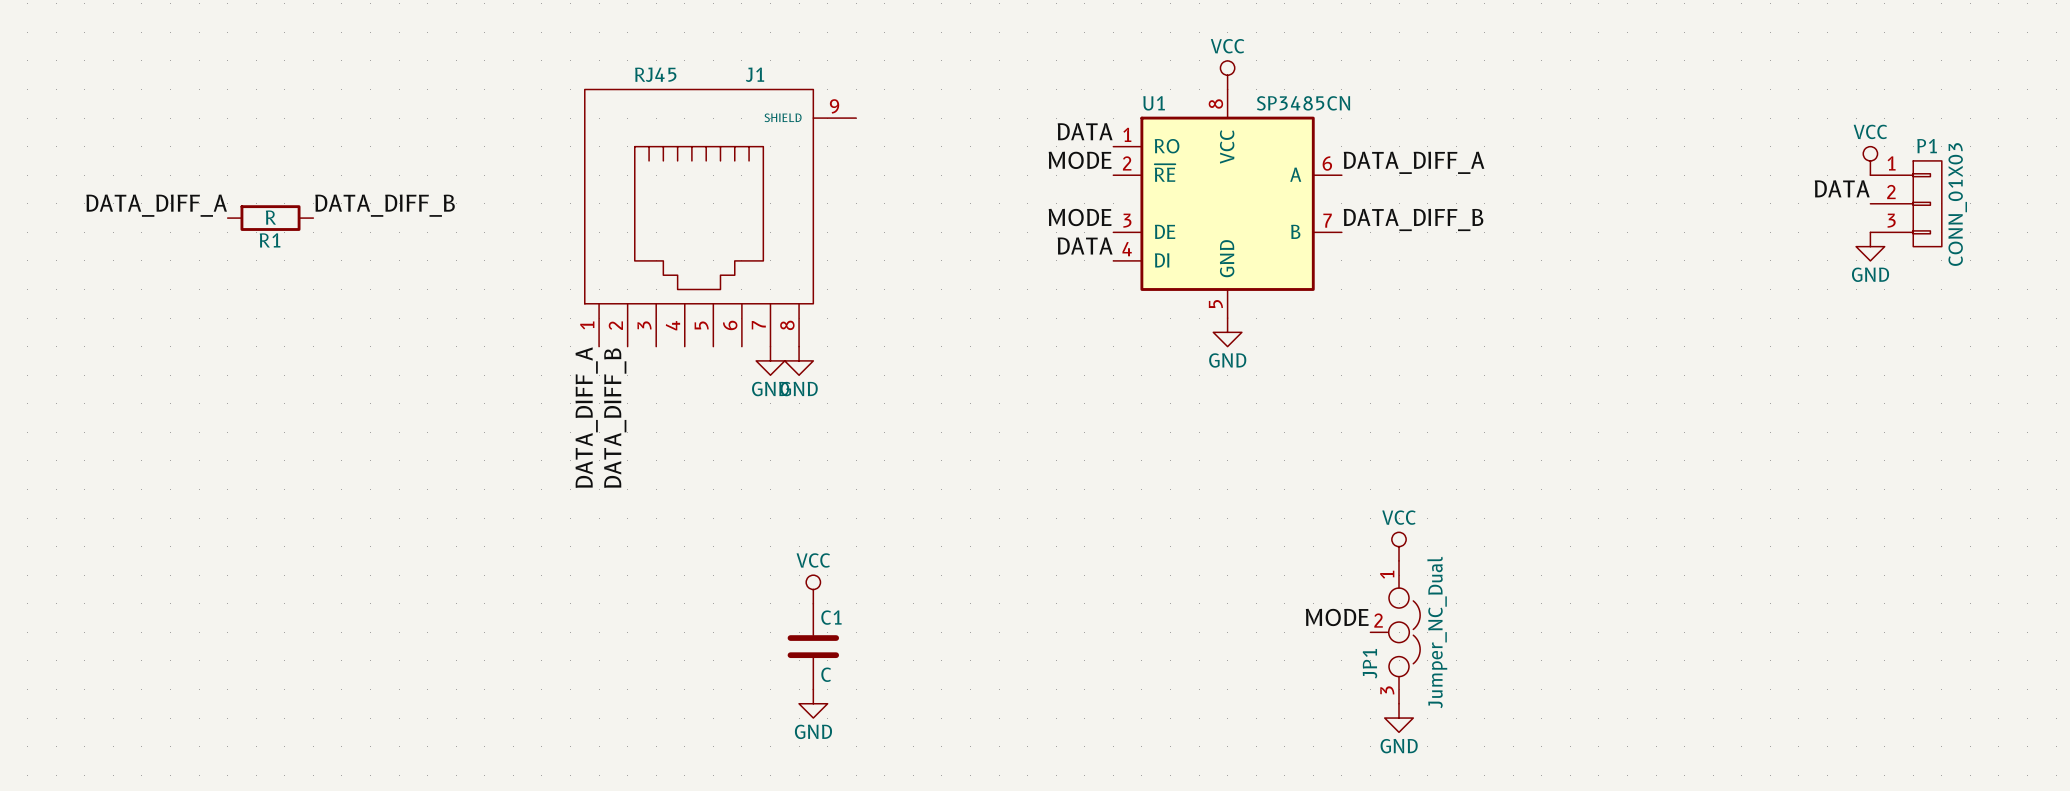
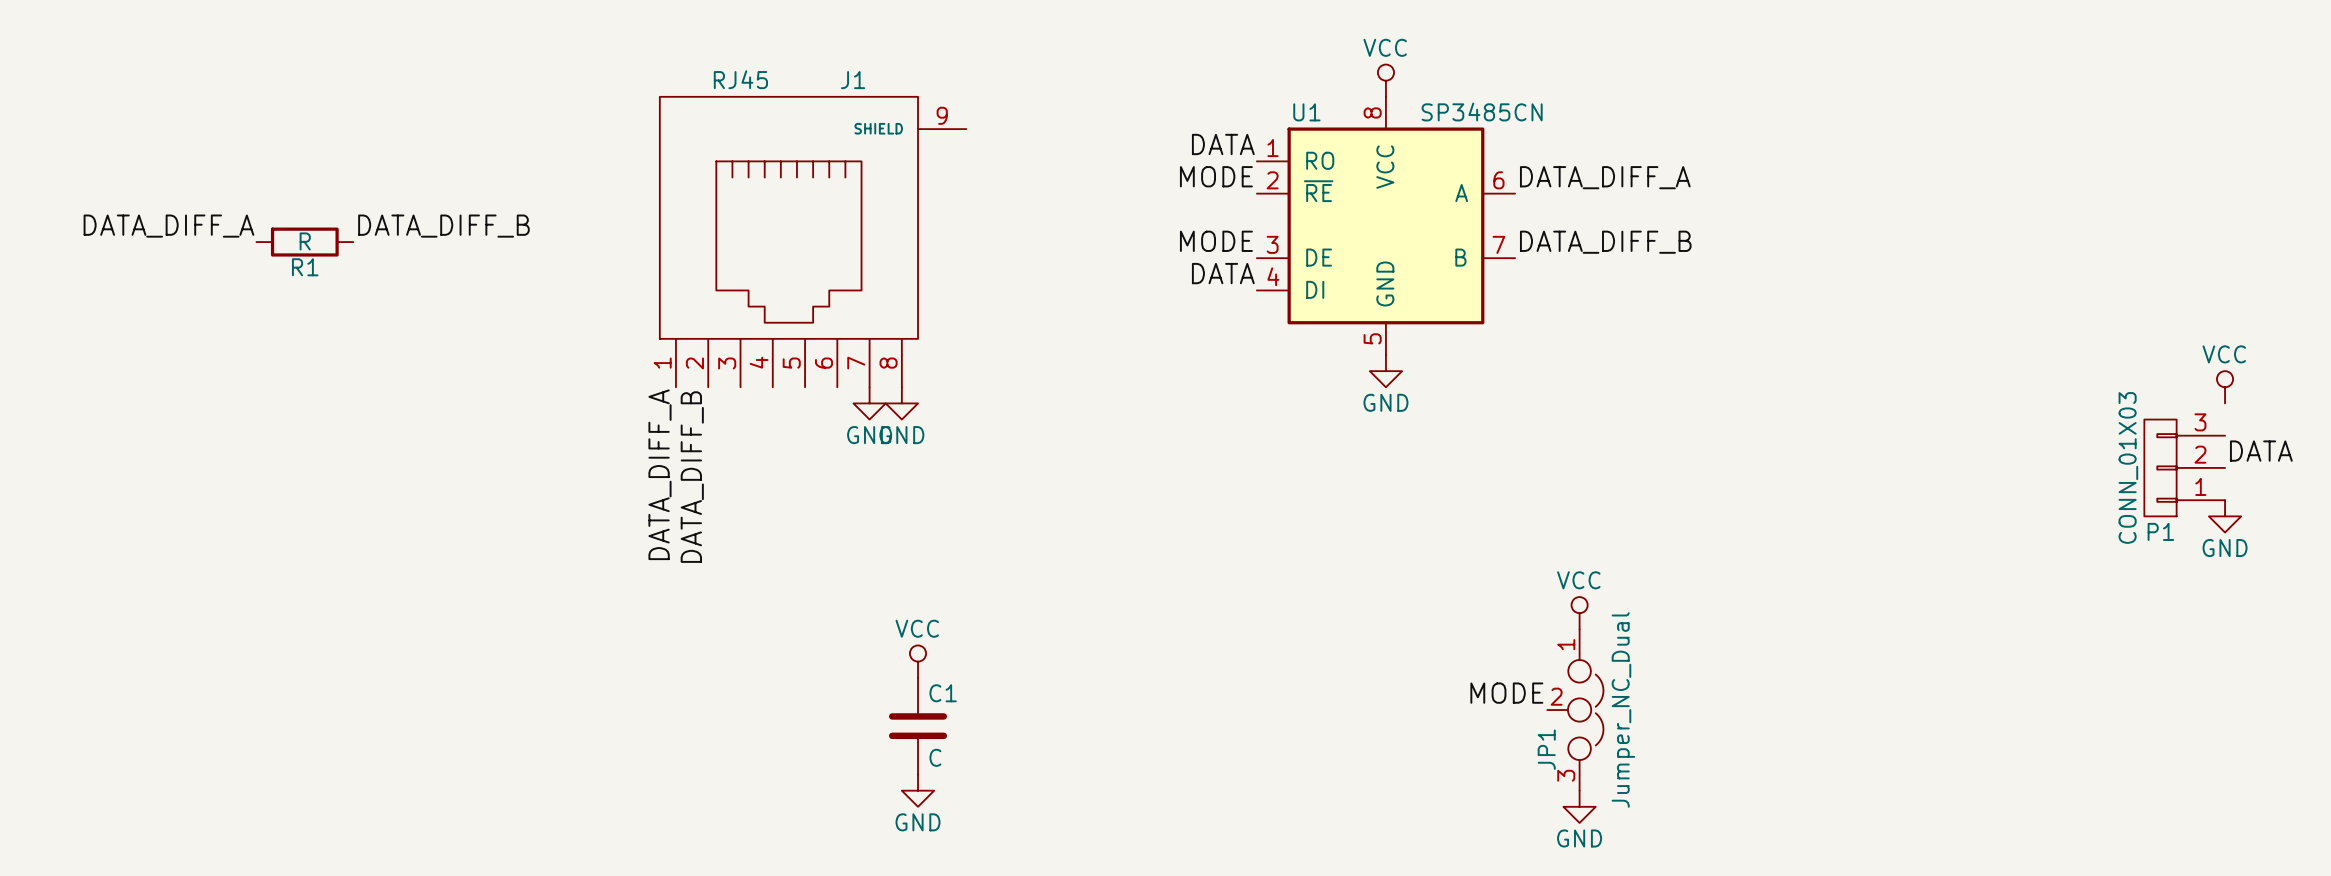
power symbol position: VCC (1870, 160) -> VCC (2225, 387)
label position: DATA (1842, 188) -> DATA (2261, 451)
P1 position: (1906, 203) -> (2184, 467)
P1 rotation: 0° (1927, 203) -> 180° (2160, 467)
power symbol position: GND (1870, 246) -> GND (2225, 516)

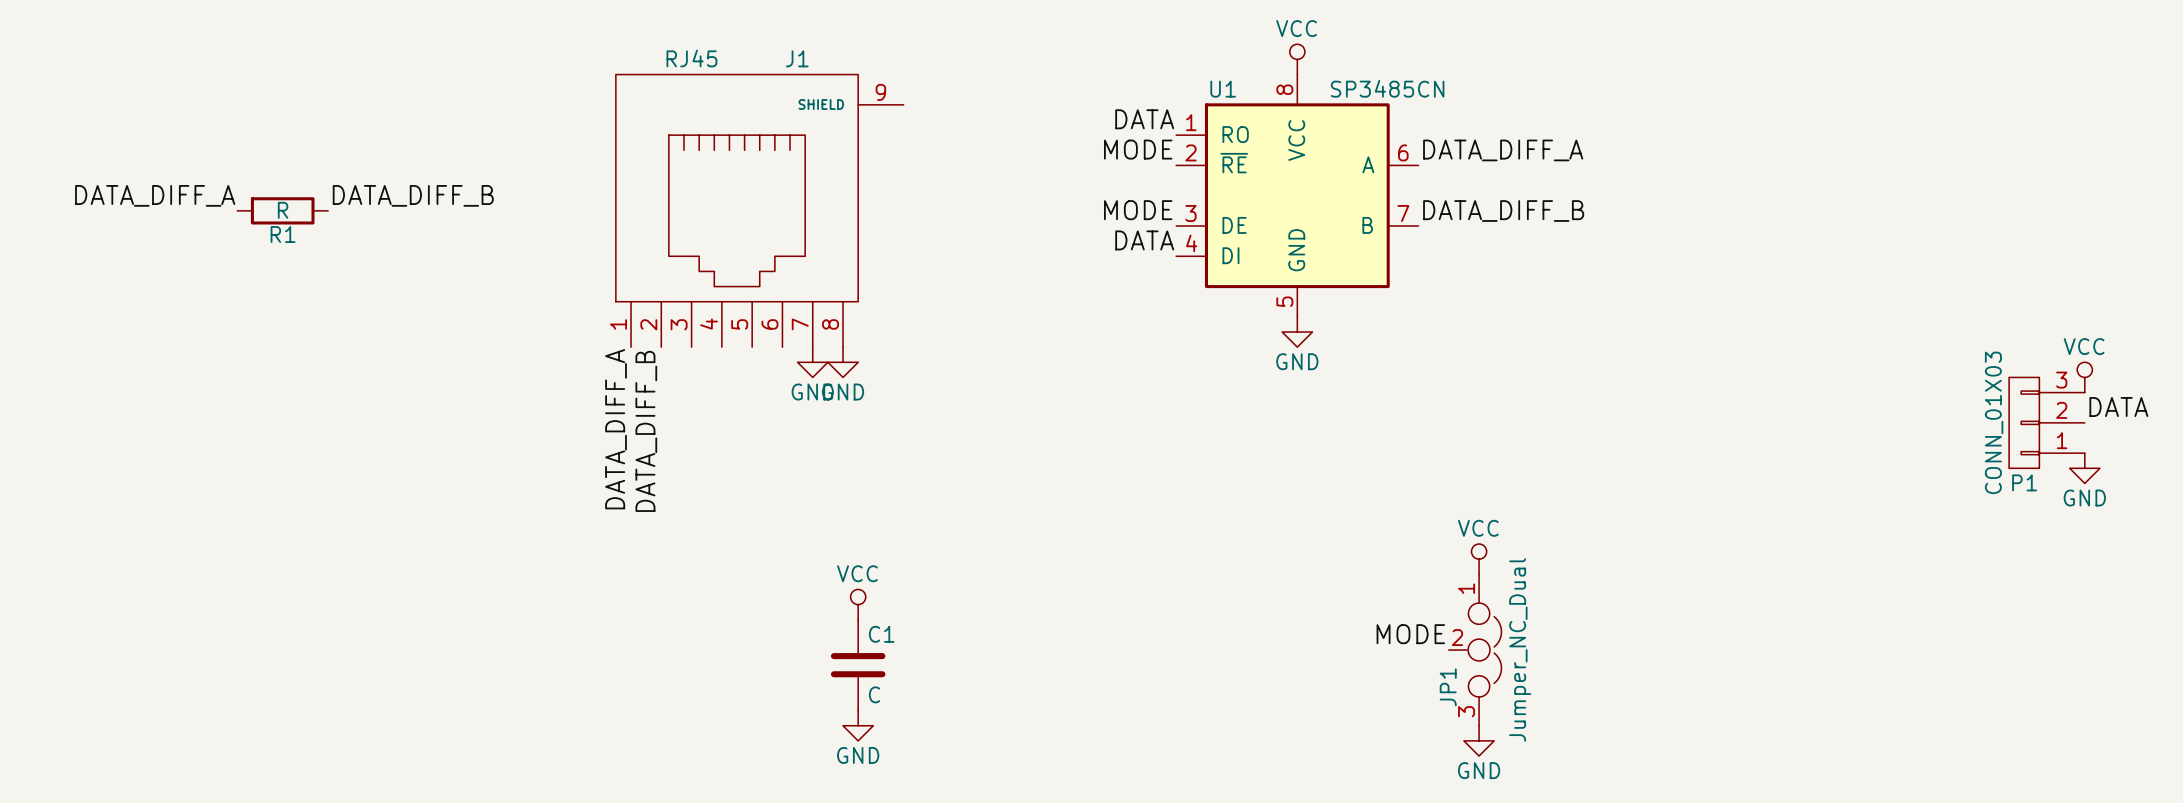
power symbol position: VCC (2225, 387) -> VCC (2084, 377)

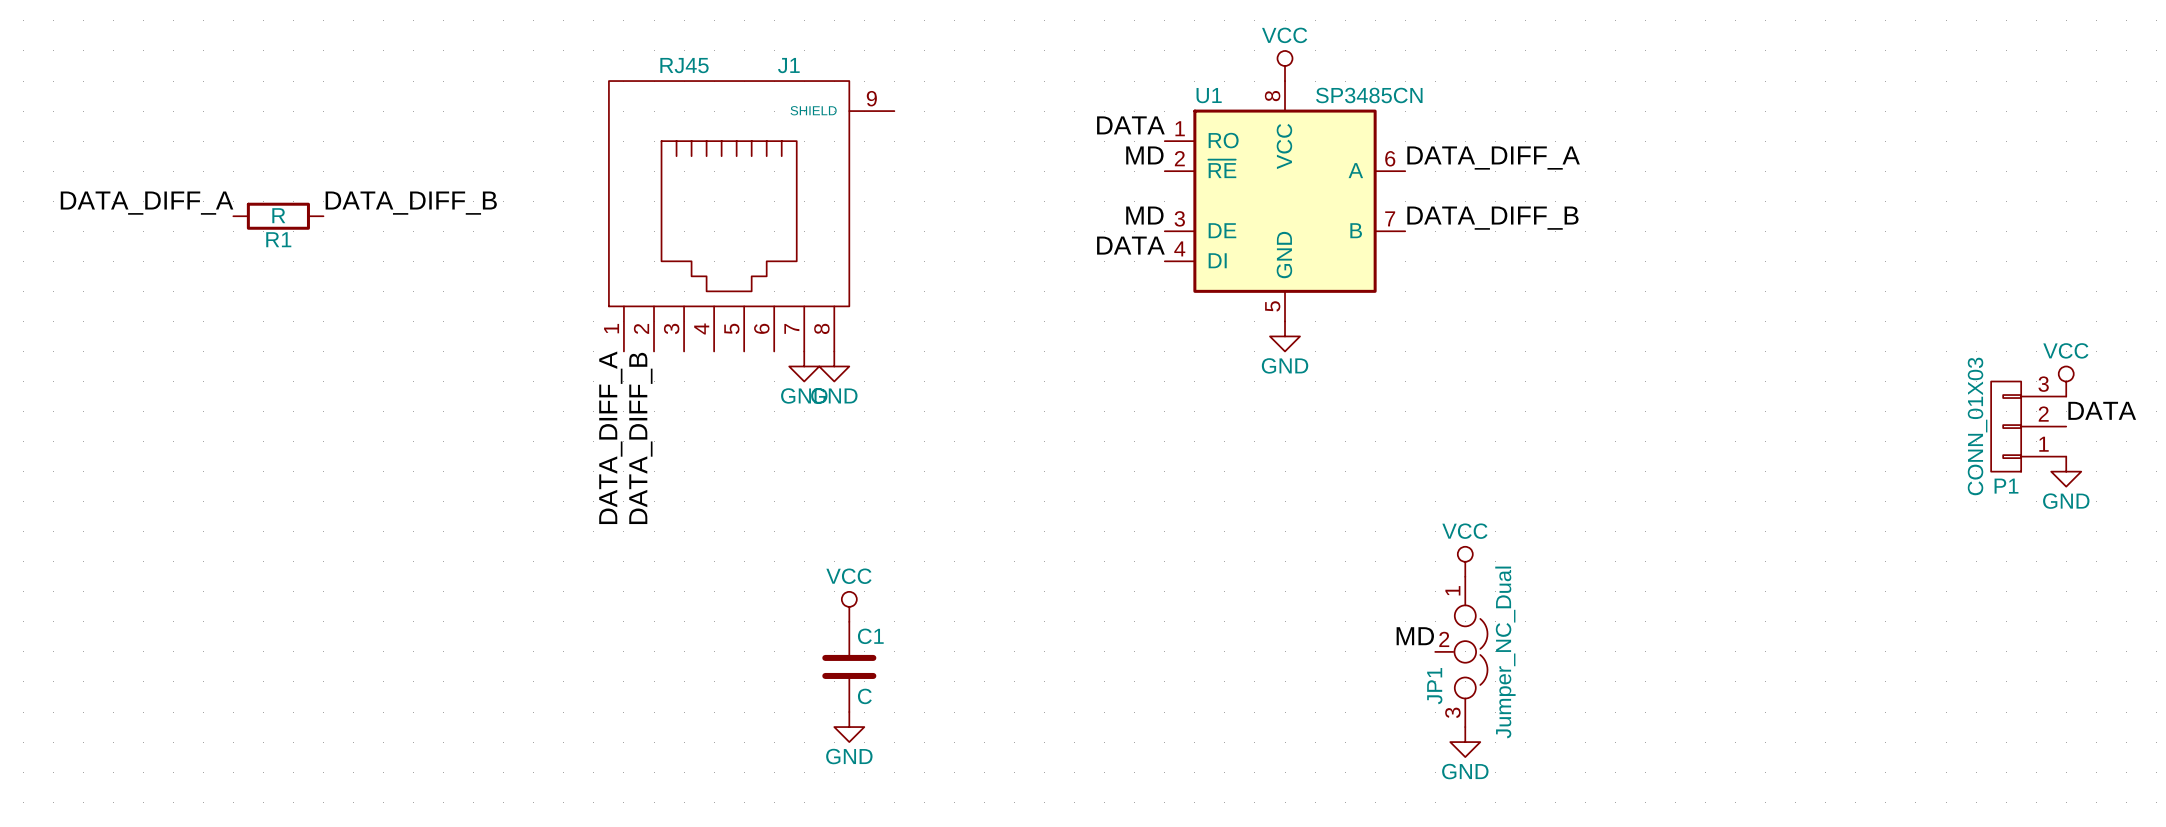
label: MODE (1138, 149) -> MD (1144, 155)
label: MODE (1138, 210) -> MD (1144, 215)
label: MODE (1410, 634) -> MD (1415, 636)

